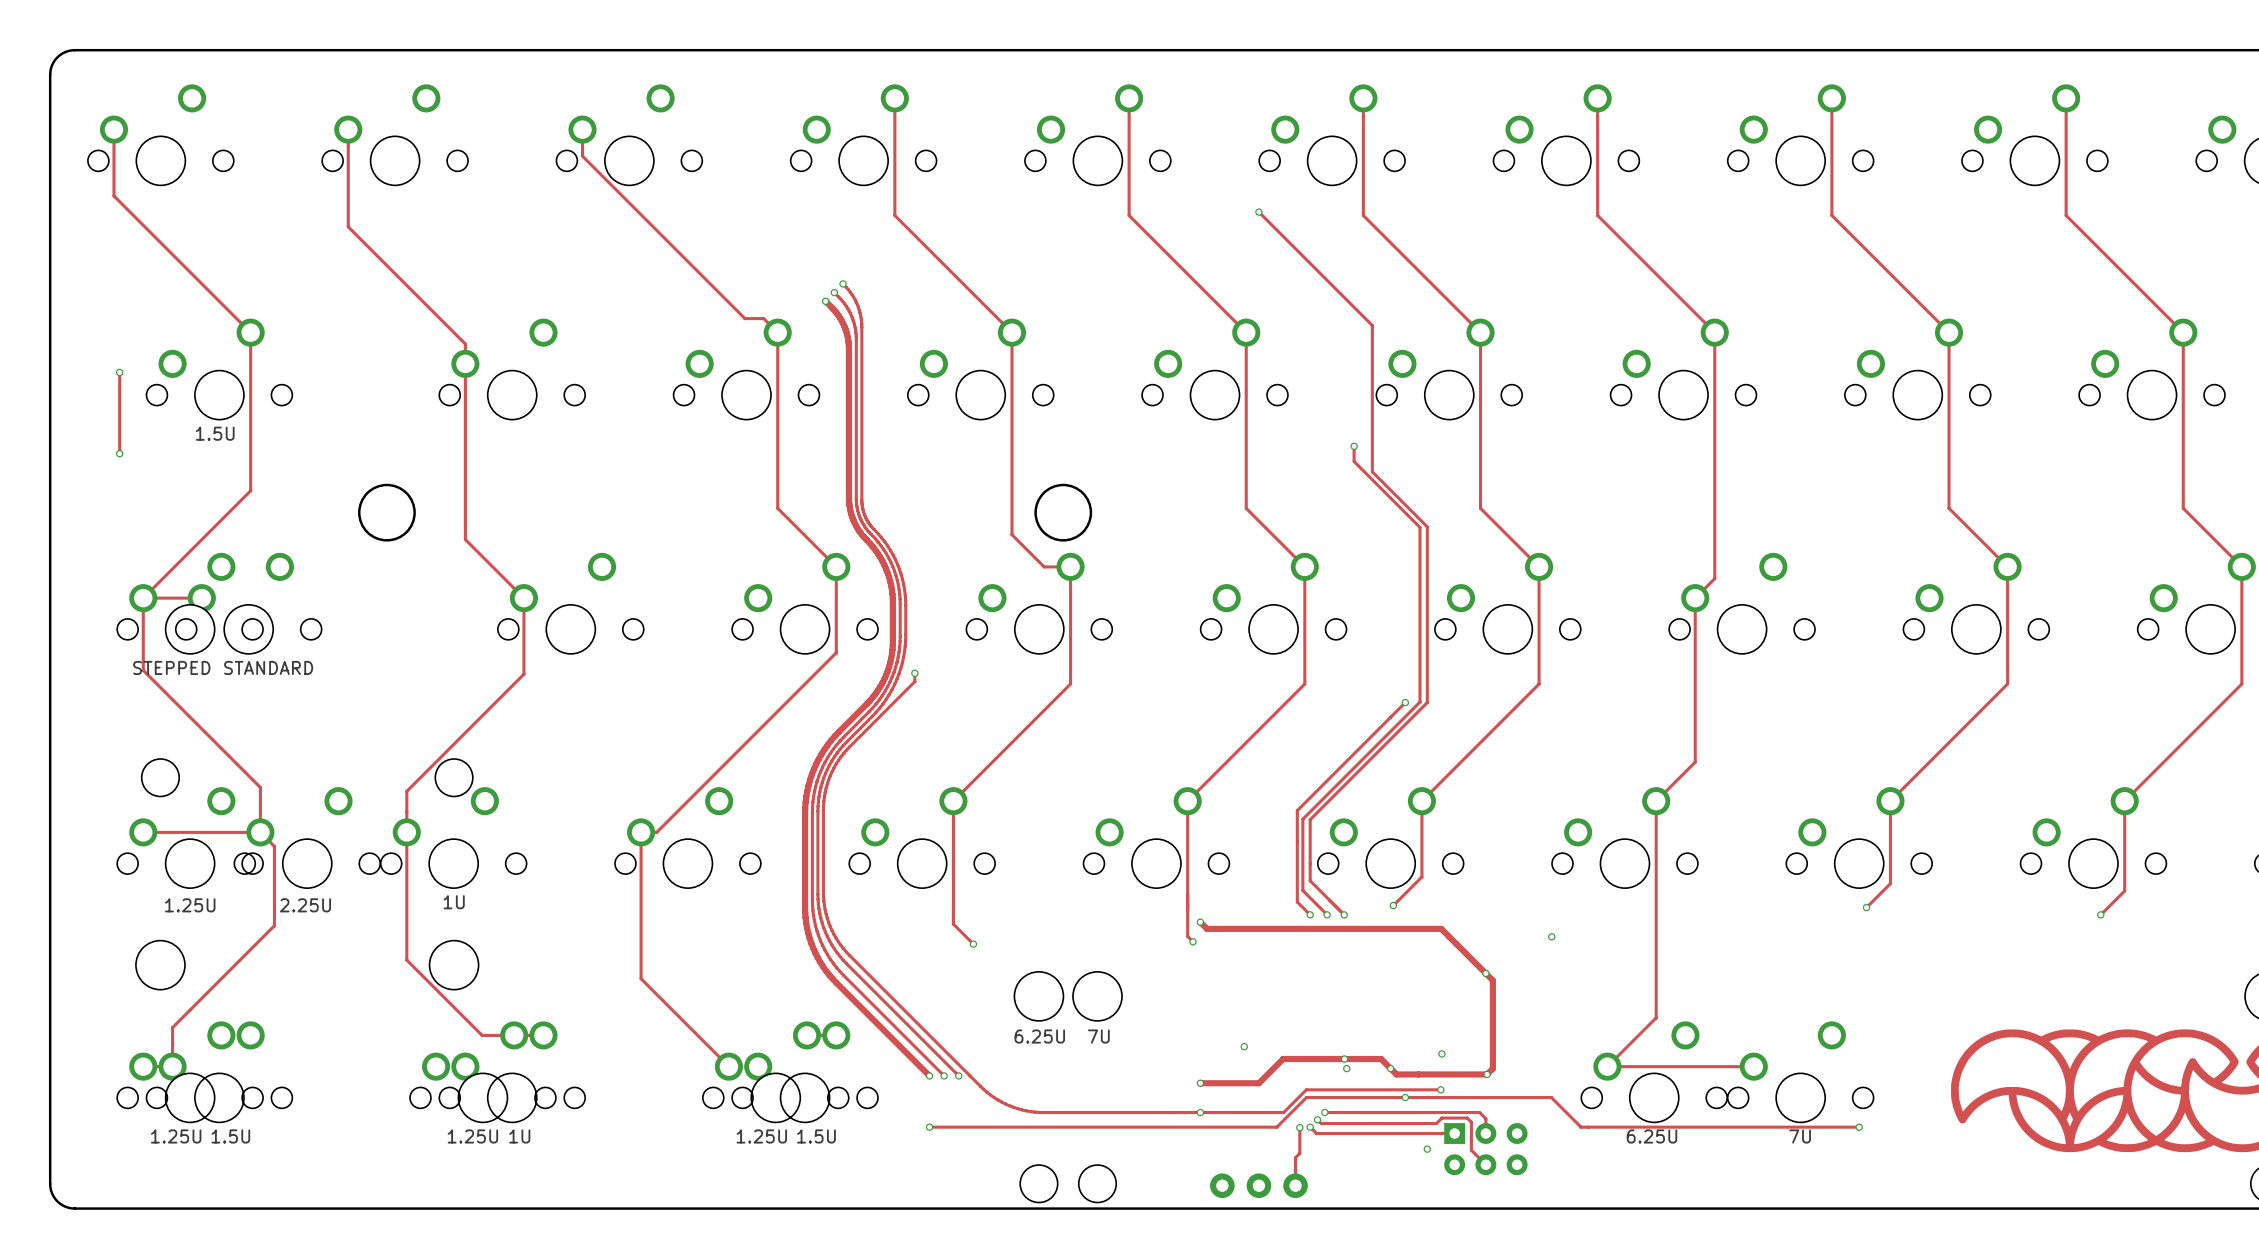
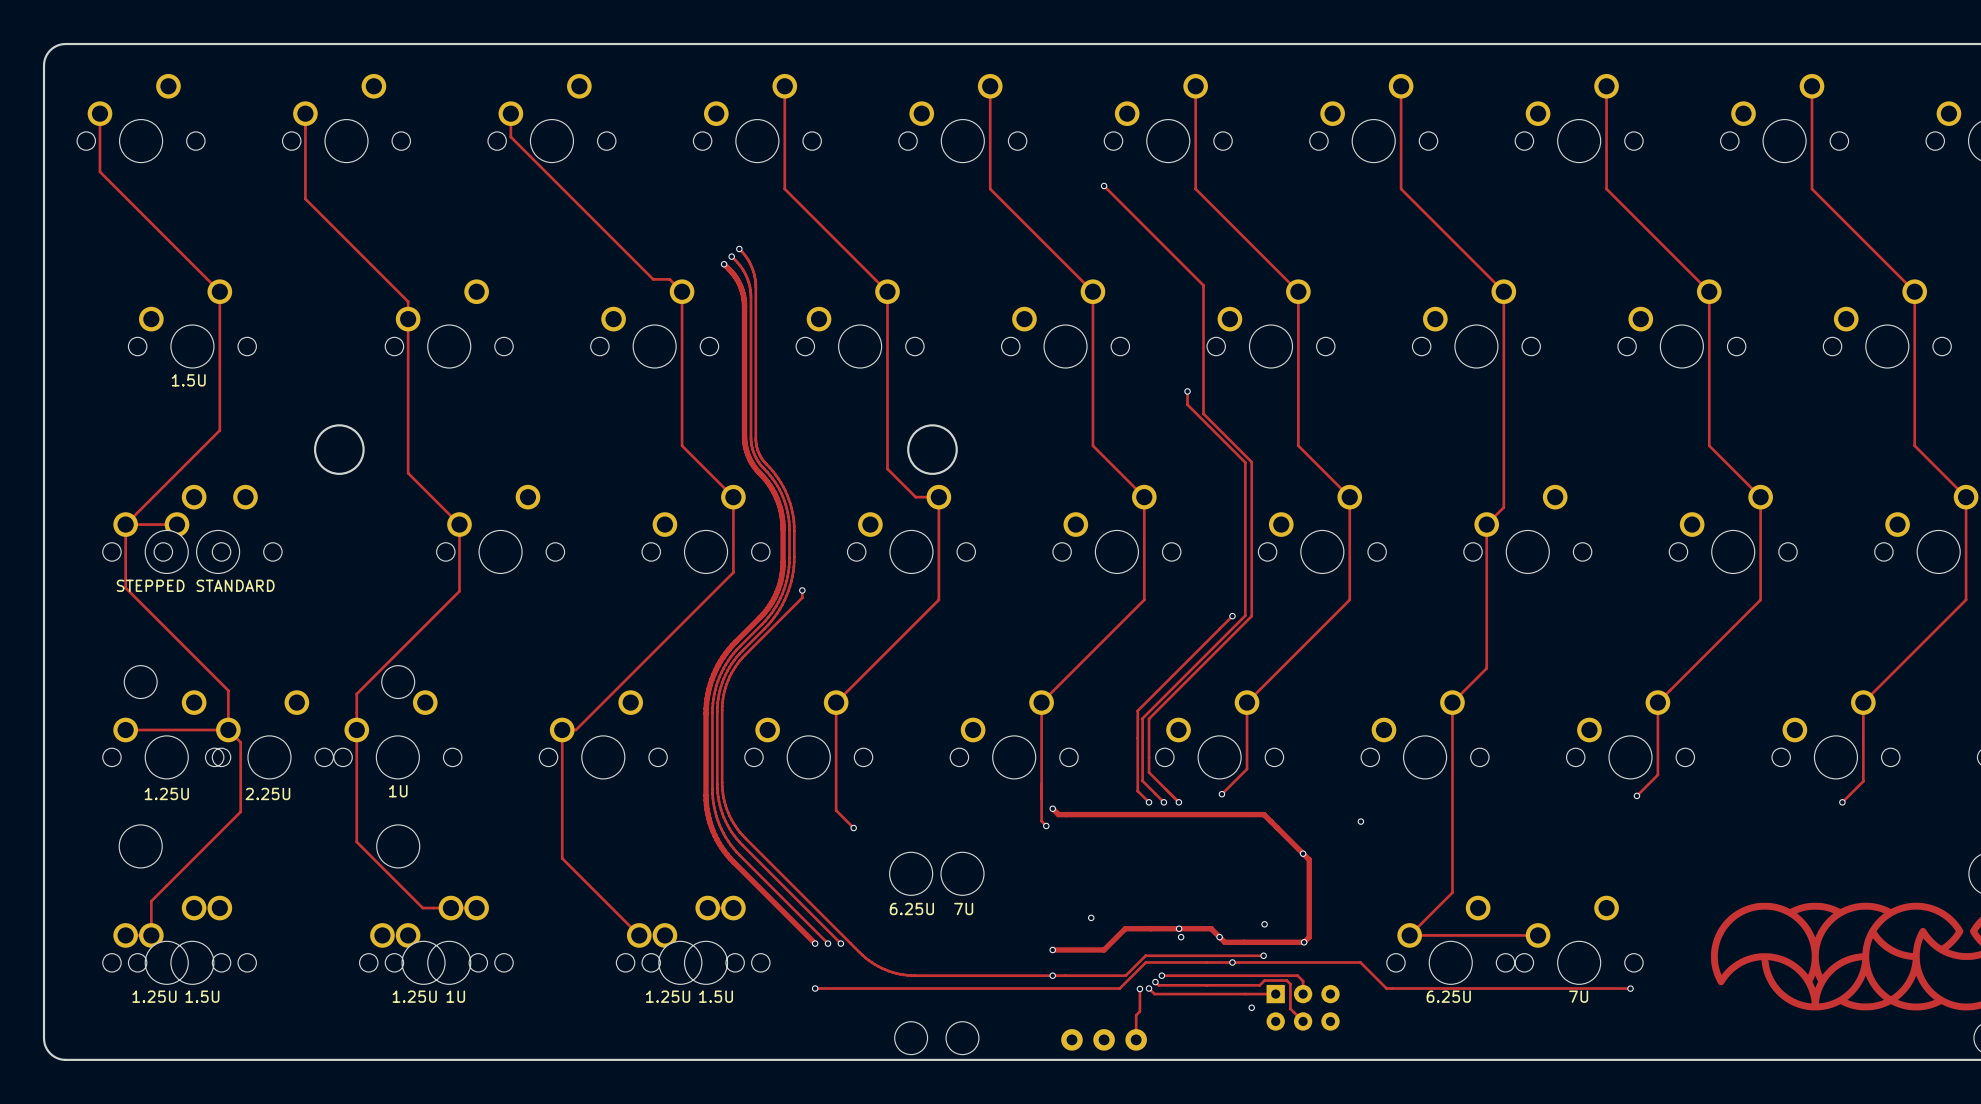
track: (119, 372) (119, 453) -> none
via: (119, 372) -> none
via: (119, 453) -> none

